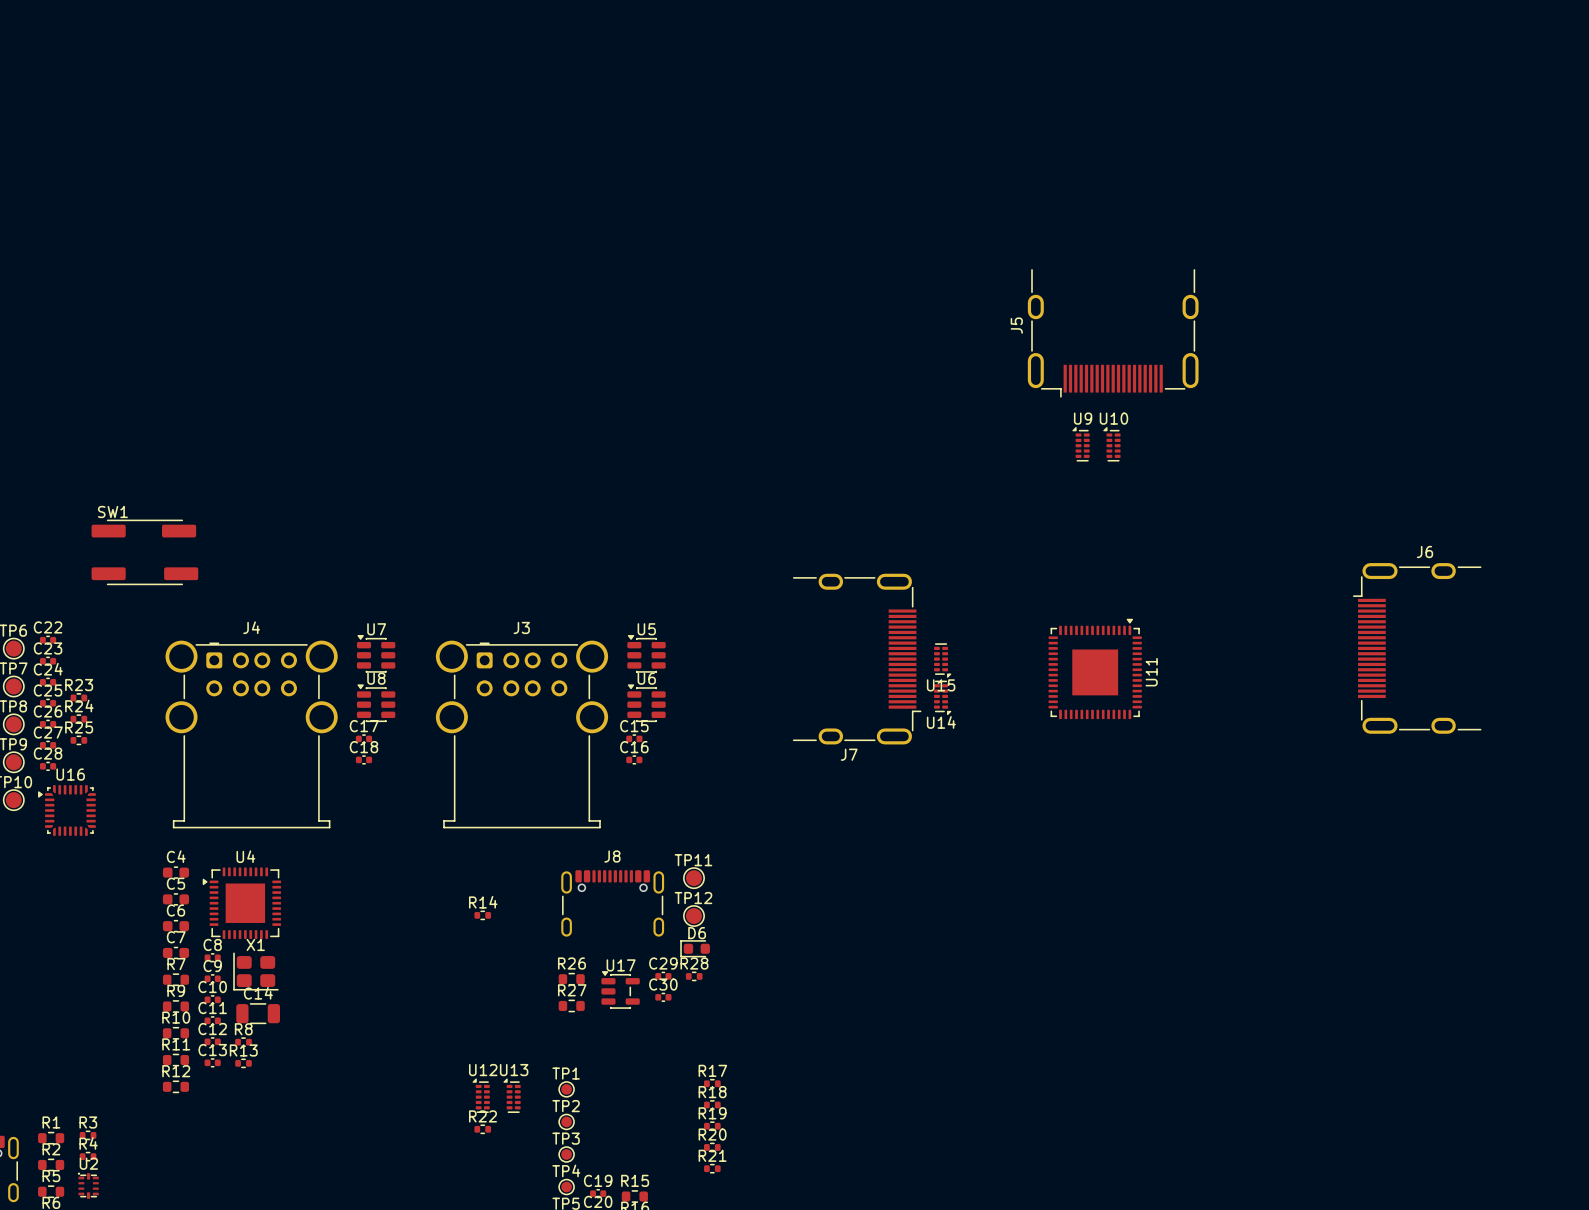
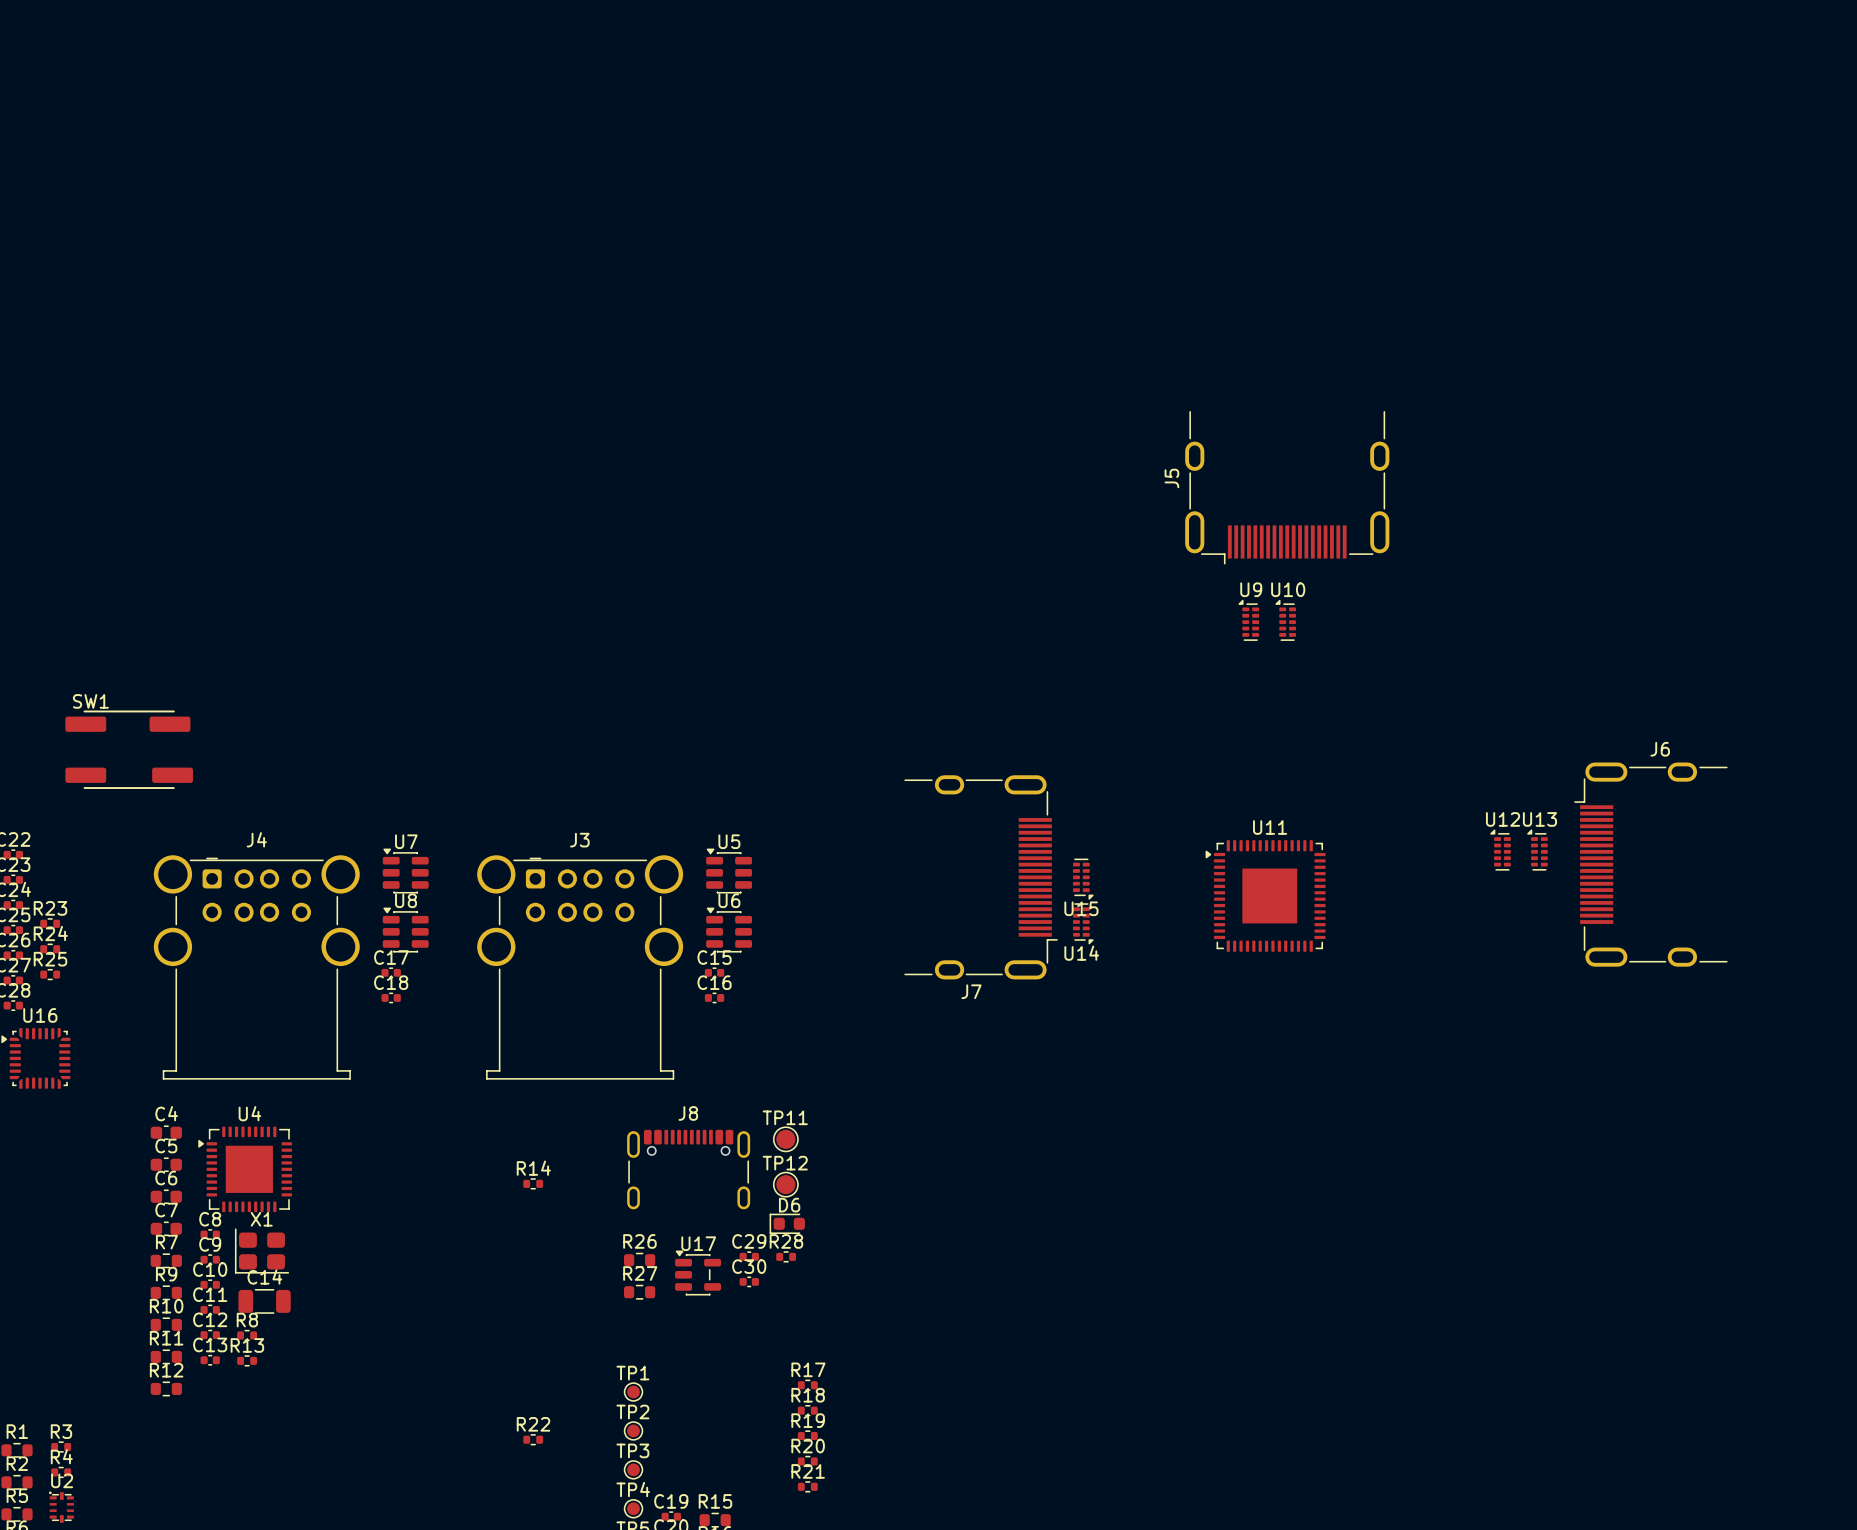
U11 rotation: 0° (1095, 668) -> 90° counterclockwise (1265, 895)
U12 position: (481, 1095) -> (1500, 850)
U13 position: (512, 1095) -> (1537, 850)

